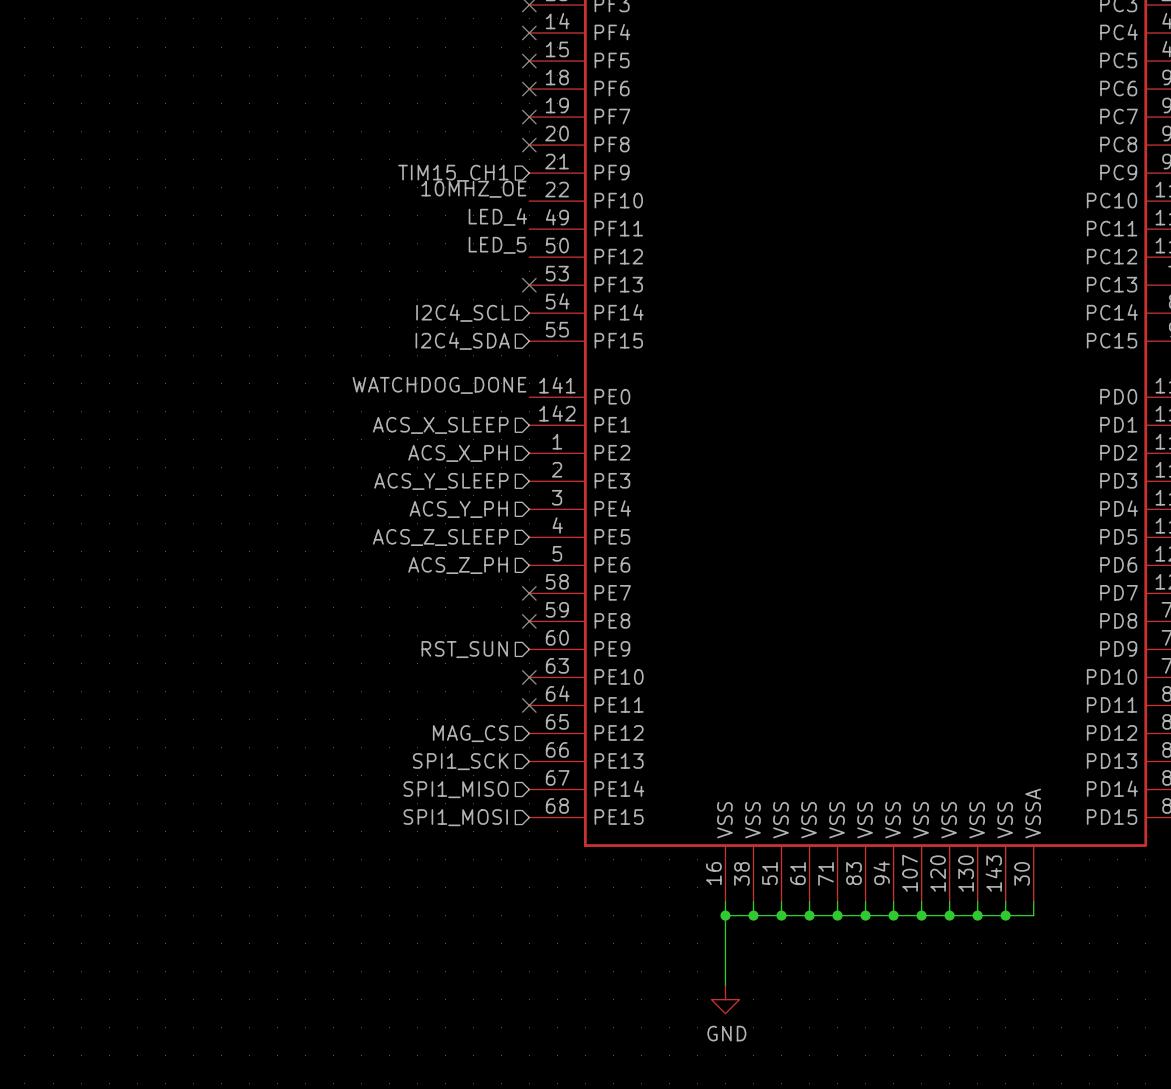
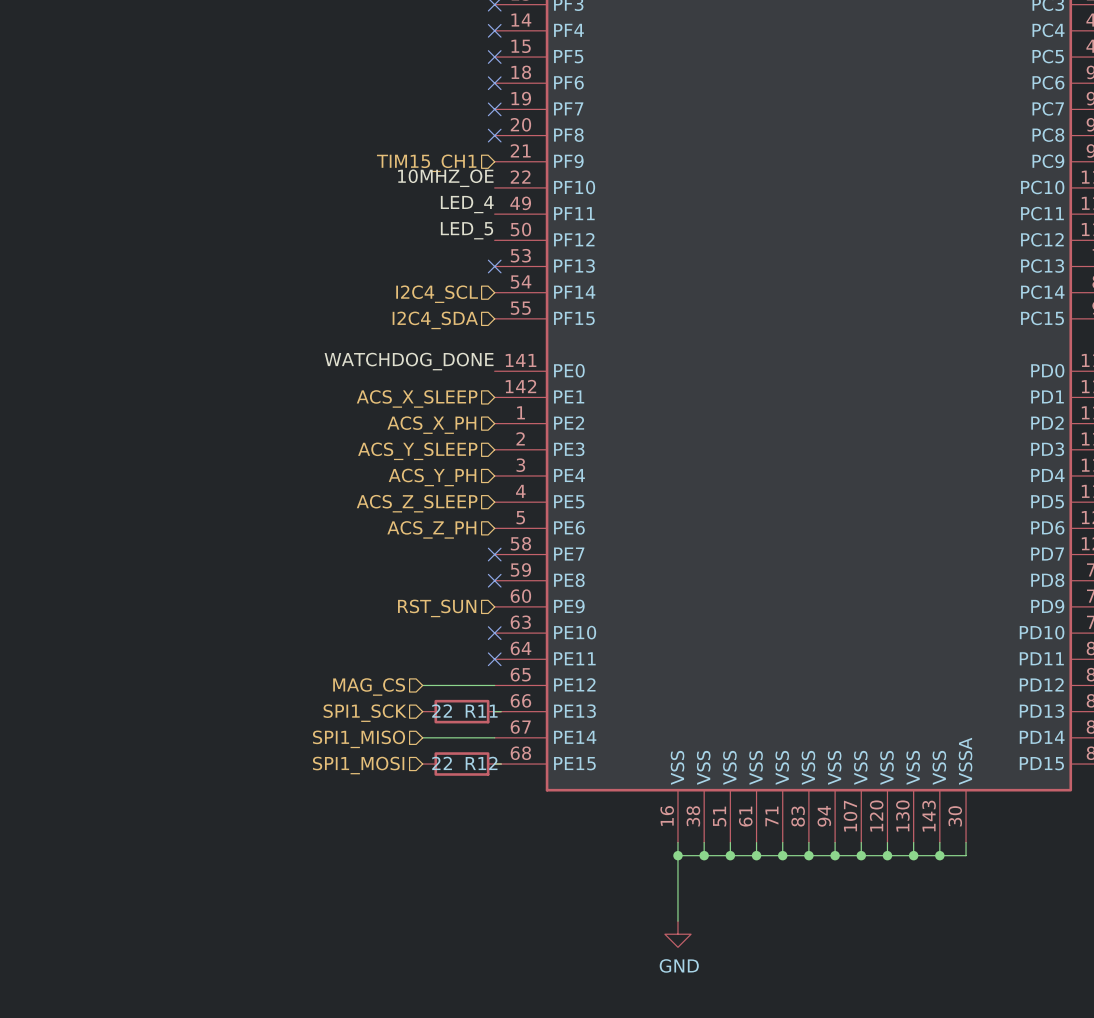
wire: none -> (422, 685) (494, 685)
hierarchical label position: MAG_CS (470, 733) -> MAG_CS (369, 686)
hierarchical label position: SPI1_SCK (460, 761) -> SPI1_SCK (365, 713)
R11: none -> 22 (461, 711)
wire: none -> (422, 737) (494, 737)
hierarchical label position: SPI1_MISO (456, 789) -> SPI1_MISO (359, 739)
hierarchical label position: SPI1_MOSI (455, 817) -> SPI1_MOSI (358, 765)
R12: none -> 22 (461, 764)

